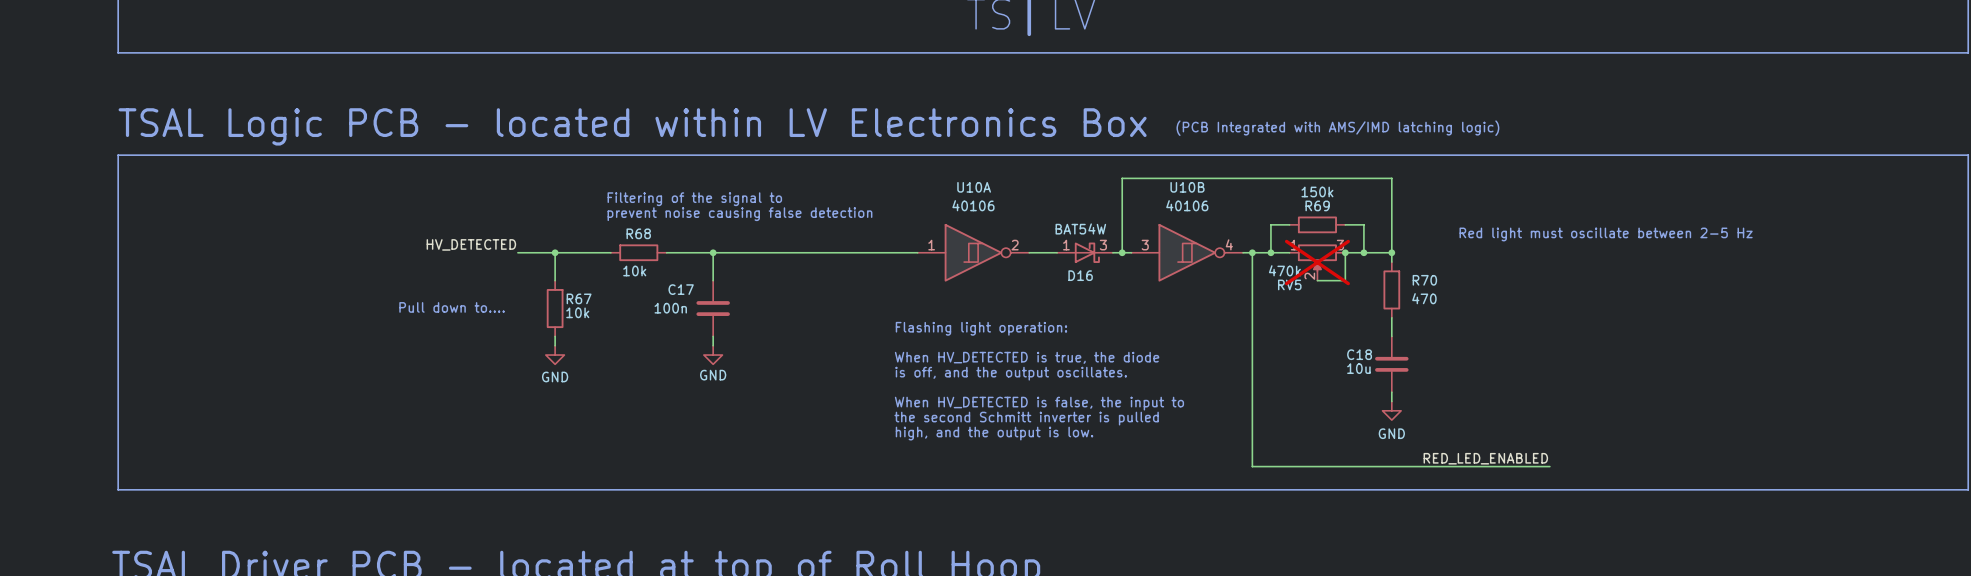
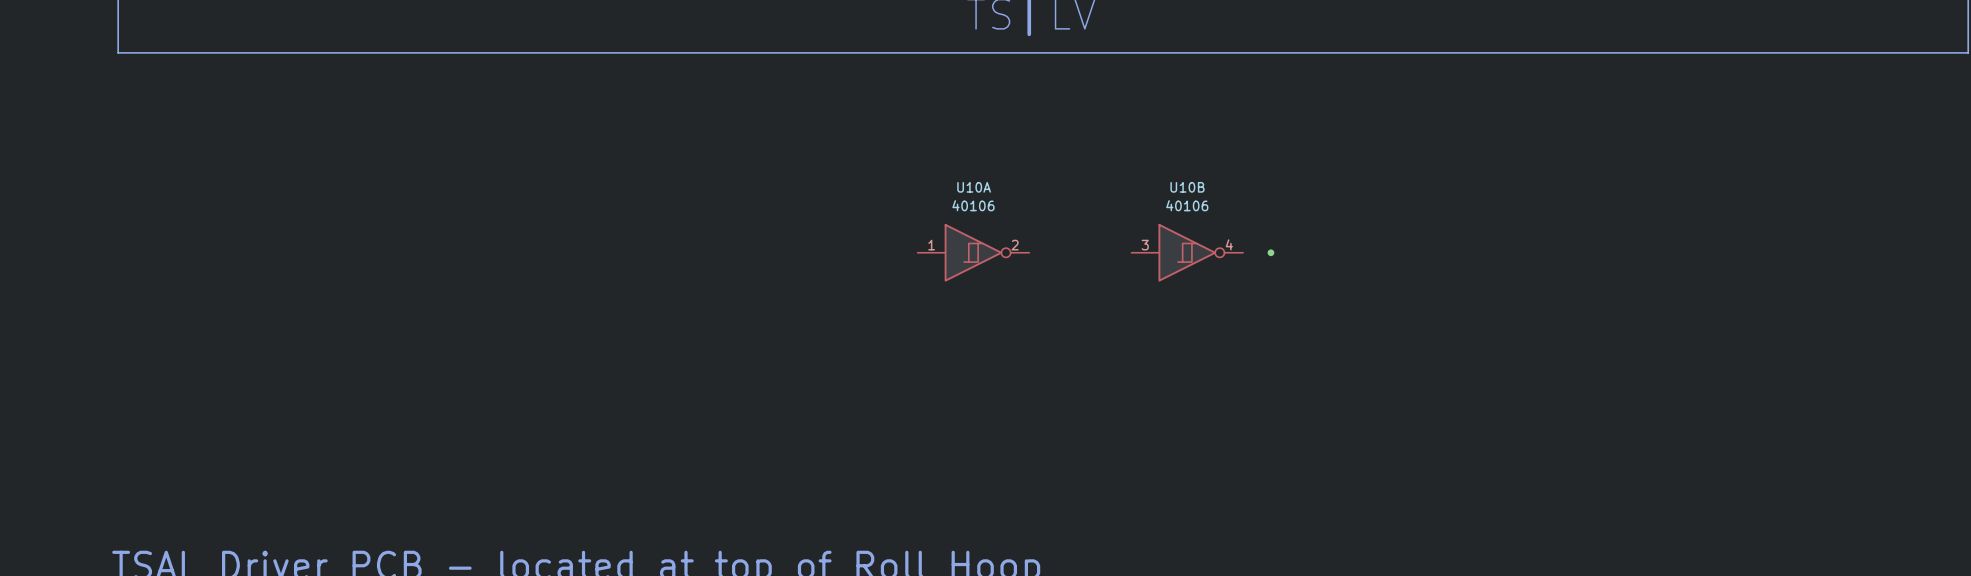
text: TSAL Logic PCB - located within LV Electronics Box (632, 126) -> none
text: (PCB Integrated with AMS/IMD latching logic) (1337, 128) -> none
line: (118, 155) (118, 489) (1968, 489) (1968, 155) (118, 155) -> none
text: Filtering of the signal to (694, 199) -> none
text: prevent noise causing false detection (739, 214) -> none
wire: (1289, 224) (1270, 224) (1270, 252) -> none
R69: 150k (1317, 224) -> none
wire: (1345, 224) (1363, 224) (1363, 252) -> none
text: Red light must oscillate between 2-5 Hz (1606, 234) -> none
label: HV_DETECTED (471, 244) -> none
wire: (517, 252) (610, 252) -> none
wire: (555, 252) (555, 280) -> none
junction: (555, 252) -> none
R68: 10k (638, 252) -> none
wire: (666, 252) (917, 252) -> none
wire: (713, 252) (713, 280) -> none
junction: (713, 252) -> none
wire: (1029, 252) (1057, 252) -> none
D16: BAT54W (1085, 252) -> none
wire: (1112, 252) (1131, 252) -> none
wire: (1122, 252) (1122, 178) (1391, 178) (1391, 262) -> none
junction: (1122, 252) -> none
wire: (1243, 252) (1289, 252) -> none
wire: (1252, 252) (1252, 466) (1549, 466) -> none
junction: (1252, 252) -> none
junction: (1345, 252) -> none
junction: (1363, 252) -> none
wire: (1391, 252) (1345, 252) (1345, 280) (1317, 280) -> none
junction: (1391, 252) -> none
RV5: 470k (1317, 262) -> none
R70: 470 (1391, 289) -> none
text: Pull down to.... (452, 307) -> none
R67: 10k (555, 308) -> none
C17: 100n (713, 308) -> none
wire: (1391, 317) (1391, 336) -> none
text: Flashing light operation: (981, 328) -> none
wire: (555, 336) (555, 345) -> none
wire: (713, 336) (713, 345) -> none
power symbol: GND (555, 355) -> none
power symbol: GND (713, 355) -> none
text: When HV_DETECTED is true, the diode (1027, 357) -> none
C18: 10u (1391, 364) -> none
text: is off, and the output oscillates. (1011, 373) -> none
wire: (1391, 392) (1391, 401) -> none
text: When HV_DETECTED is false, the input to (1039, 403) -> none
power symbol: GND (1391, 410) -> none
text: the second Schmitt inverter is pulled (1026, 418) -> none
text: high, and the output is low. (994, 433) -> none
label: RED_LED_ENABLED (1485, 458) -> none

